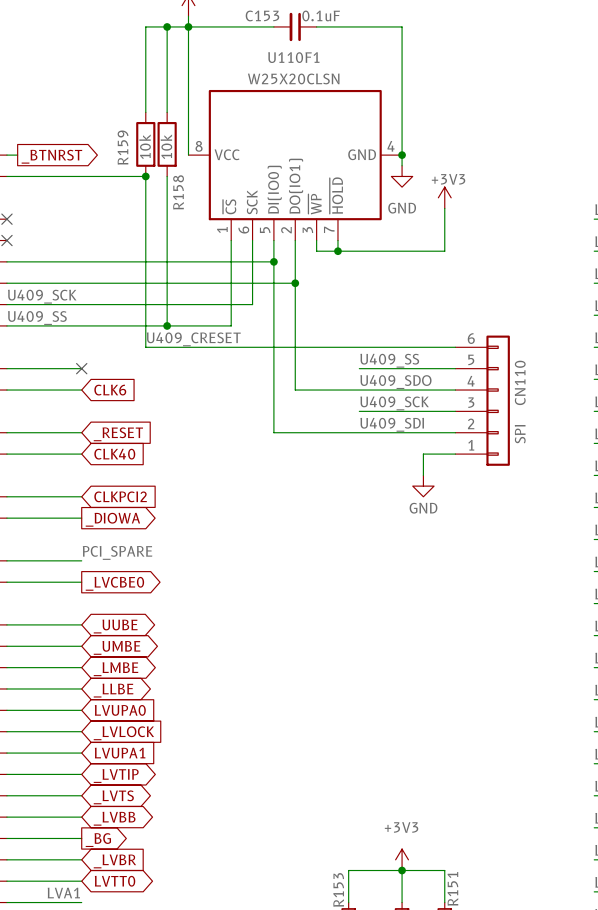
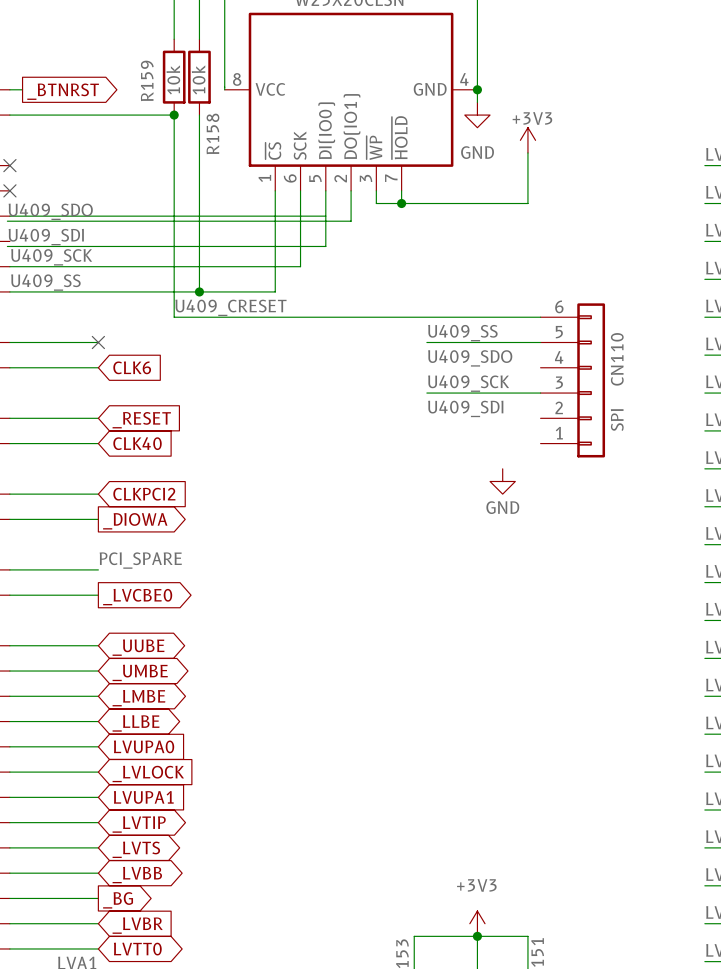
label: none -> U409_SDO (50, 211)
junction: (273, 261) -> none
wire: (295, 266) (295, 390) (455, 390) -> (351, 221) (7, 221)
label: none -> U409_SDI (46, 237)
wire: (6, 283) (295, 283) -> none
junction: (295, 283) -> none
wire: (273, 287) (273, 432) (455, 432) -> (325, 246) (7, 246)
wire: (455, 454) (423, 454) (423, 475) -> none

